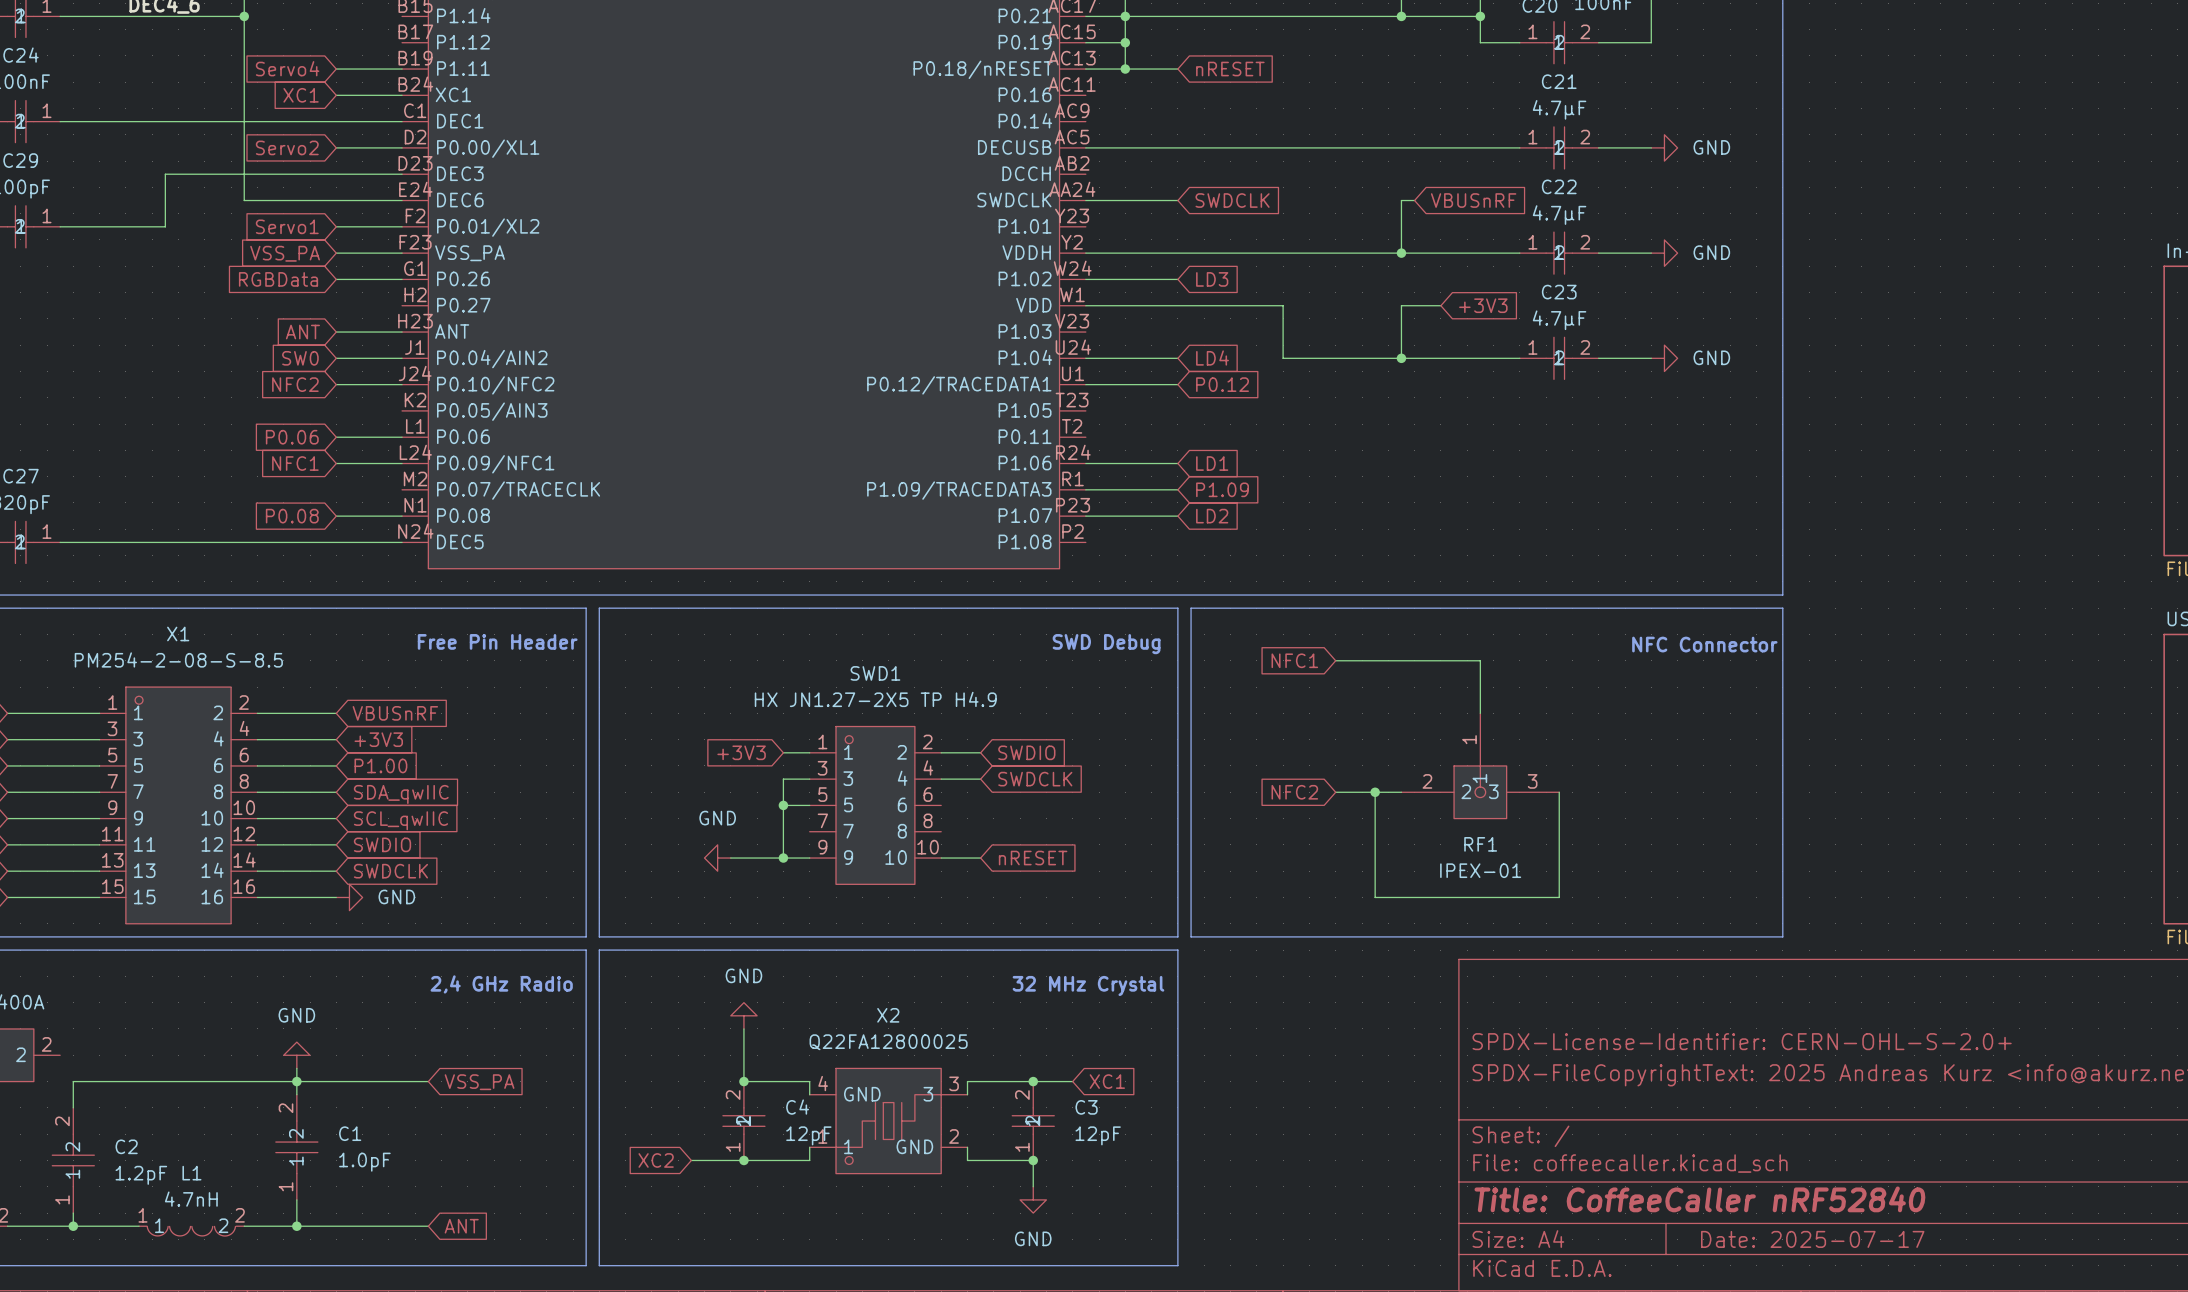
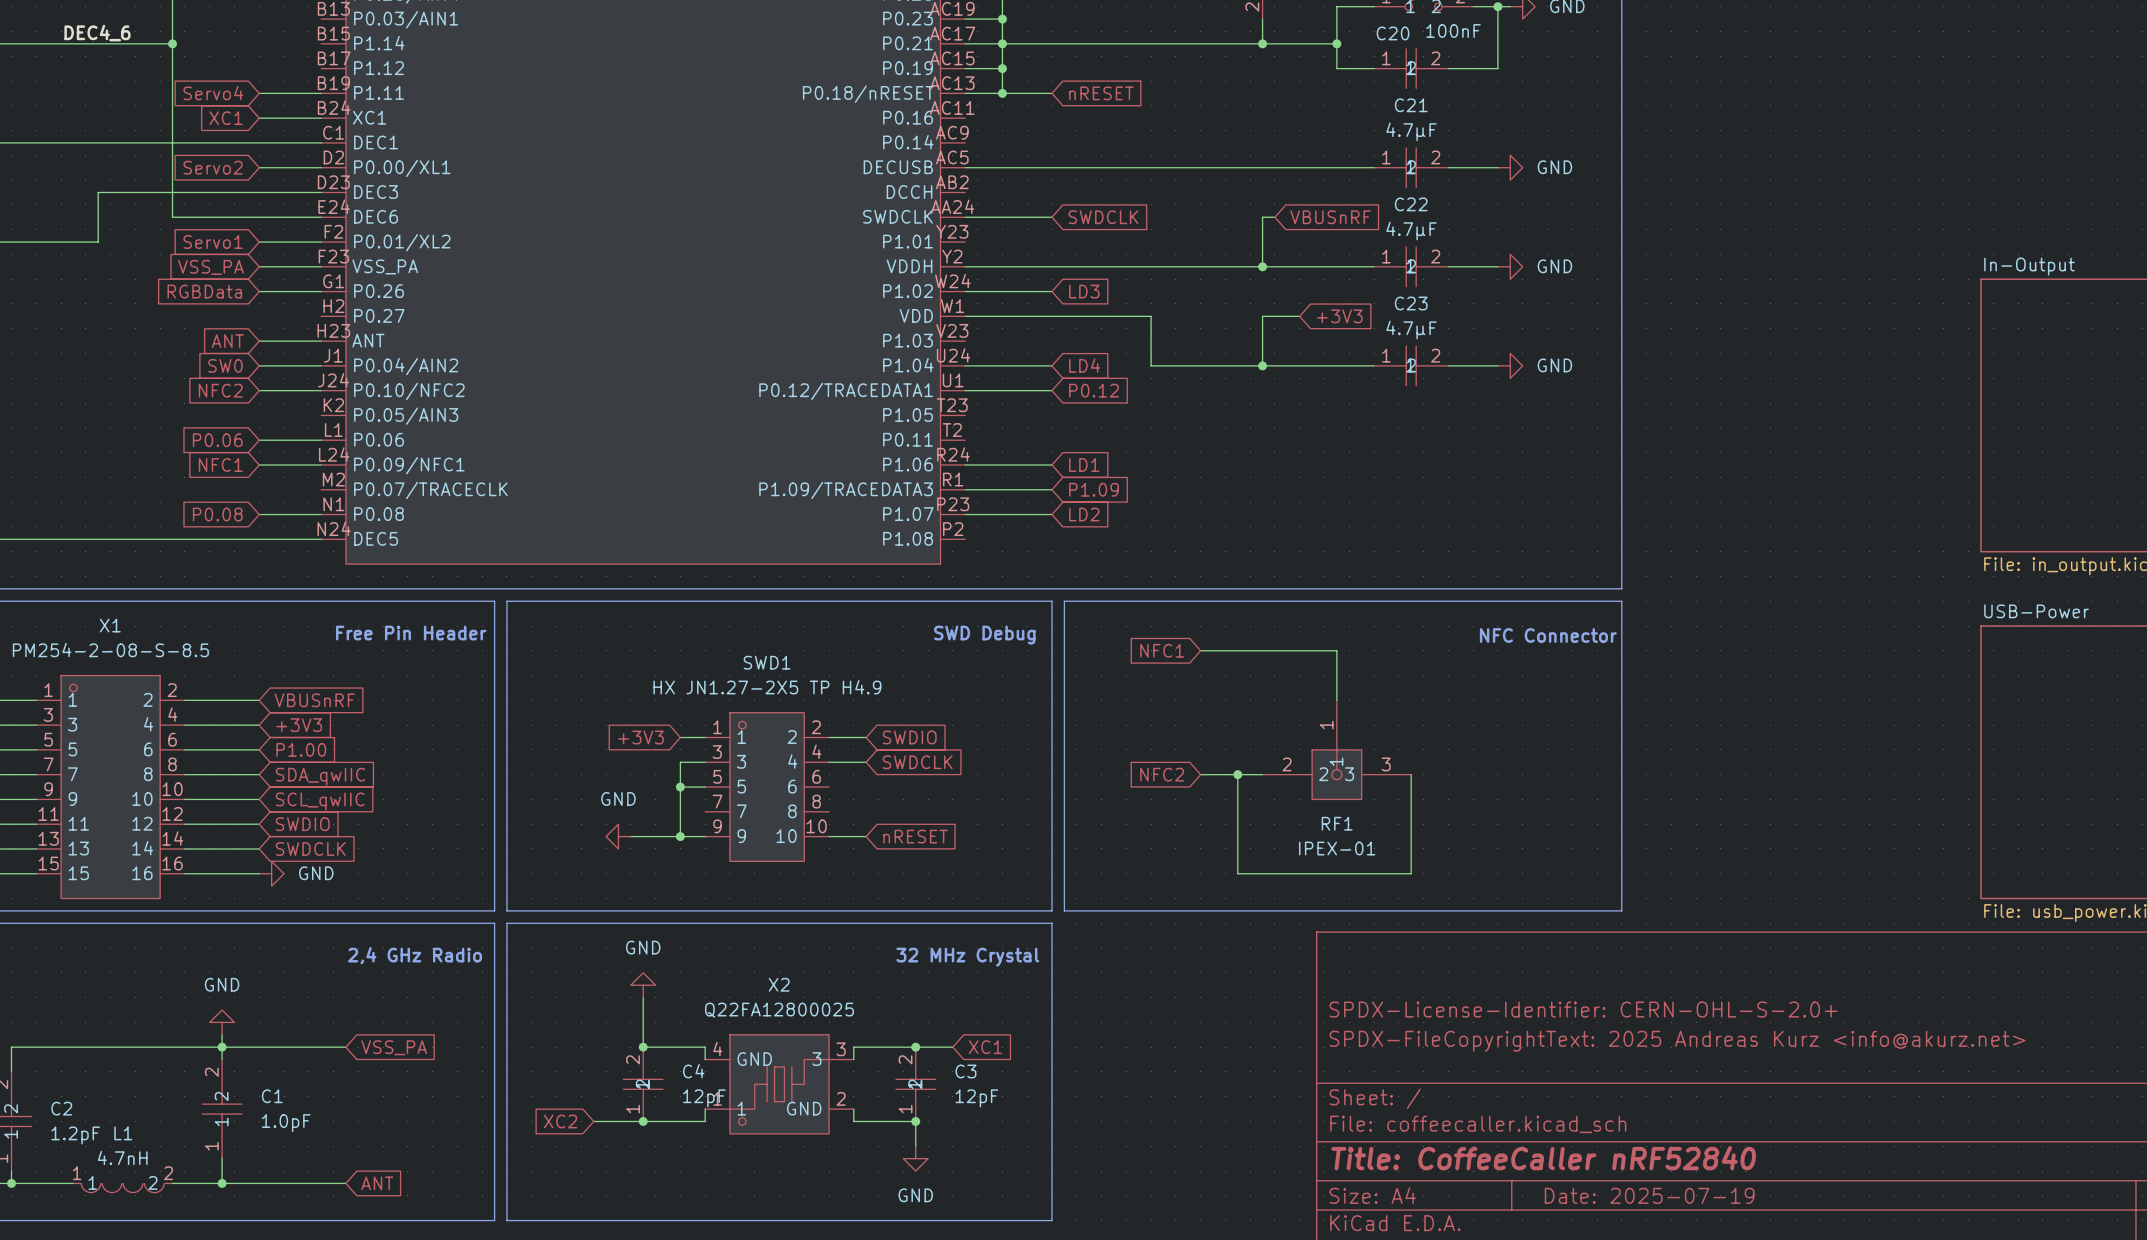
title block: Date: 2025-07-17 (1812, 1239) -> Date: 2025-07-19 (1649, 1195)

